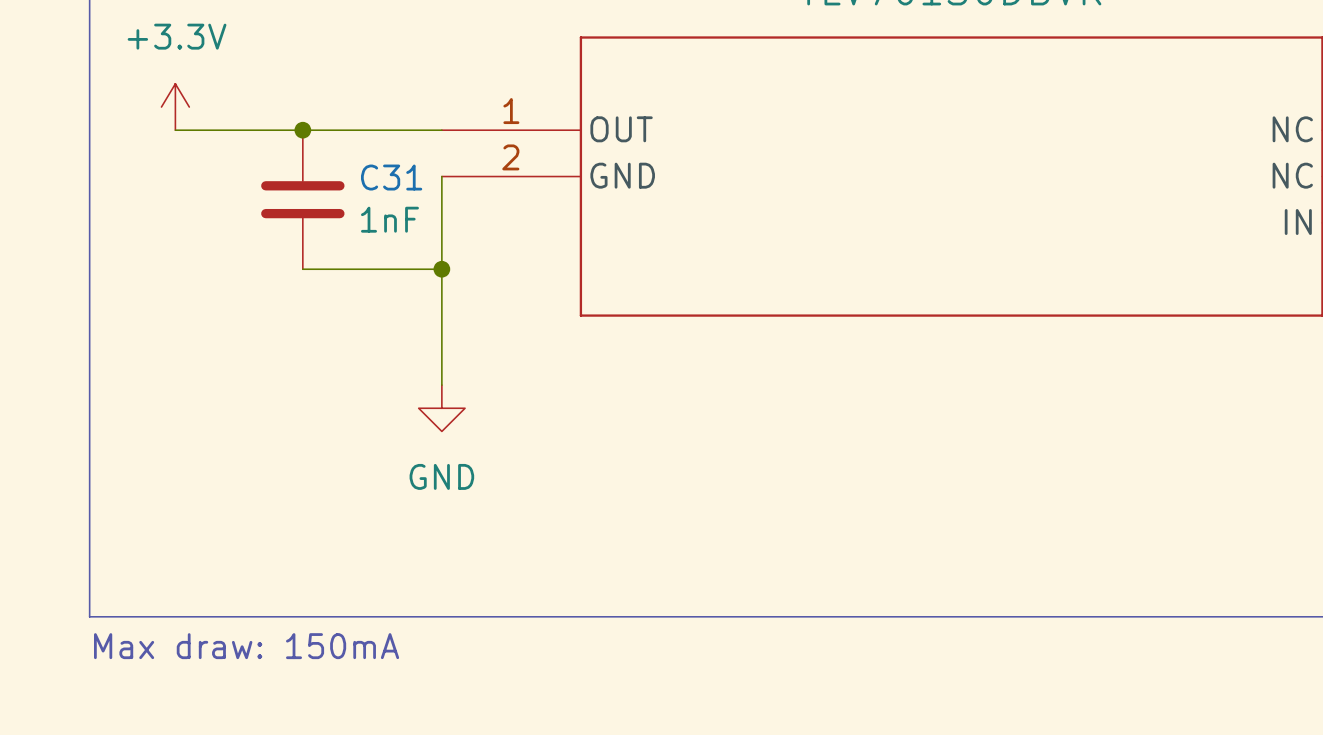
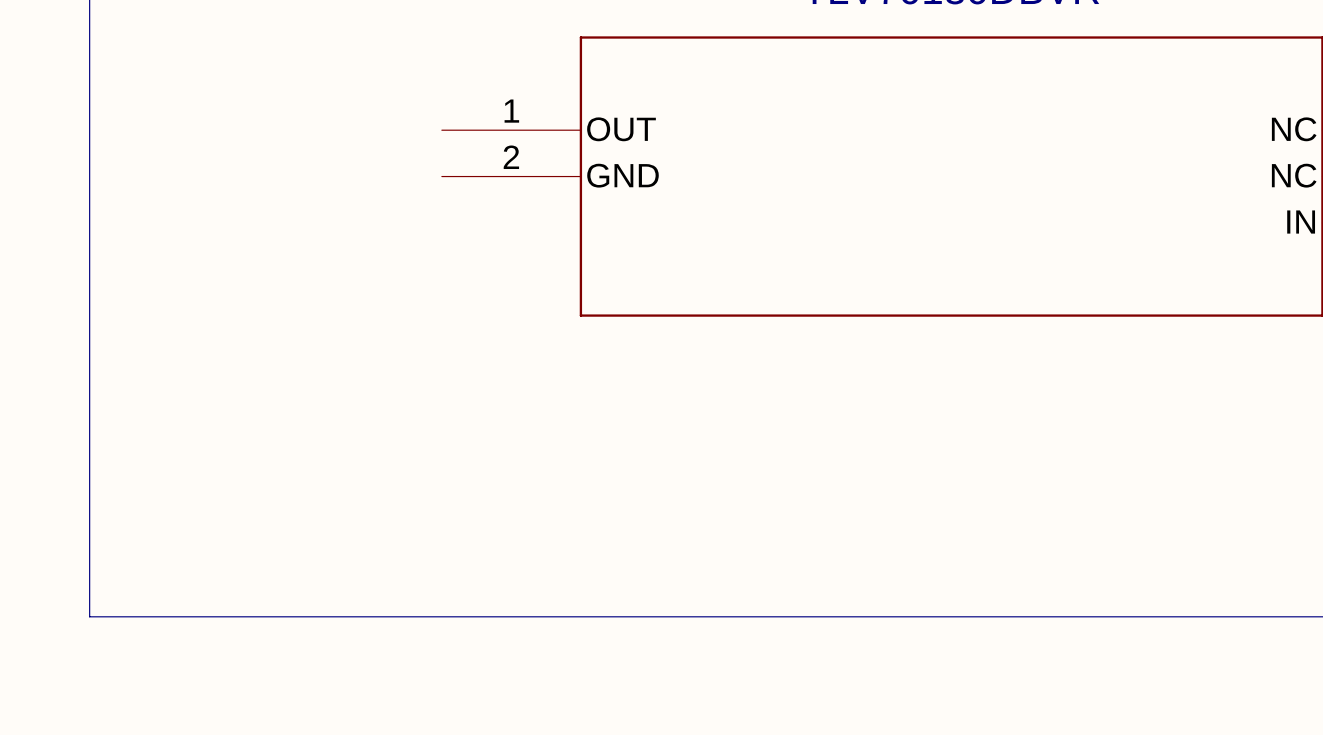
power symbol: +3.3V (175, 107) -> none
wire: (175, 130) (441, 130) -> none
junction: (302, 130) -> none
wire: (441, 176) (441, 385) -> none
C31: 1nF (302, 199) -> none
wire: (302, 269) (441, 269) -> none
junction: (441, 269) -> none
power symbol: GND (441, 408) -> none
text: Max draw: 150mA (246, 646) -> none

